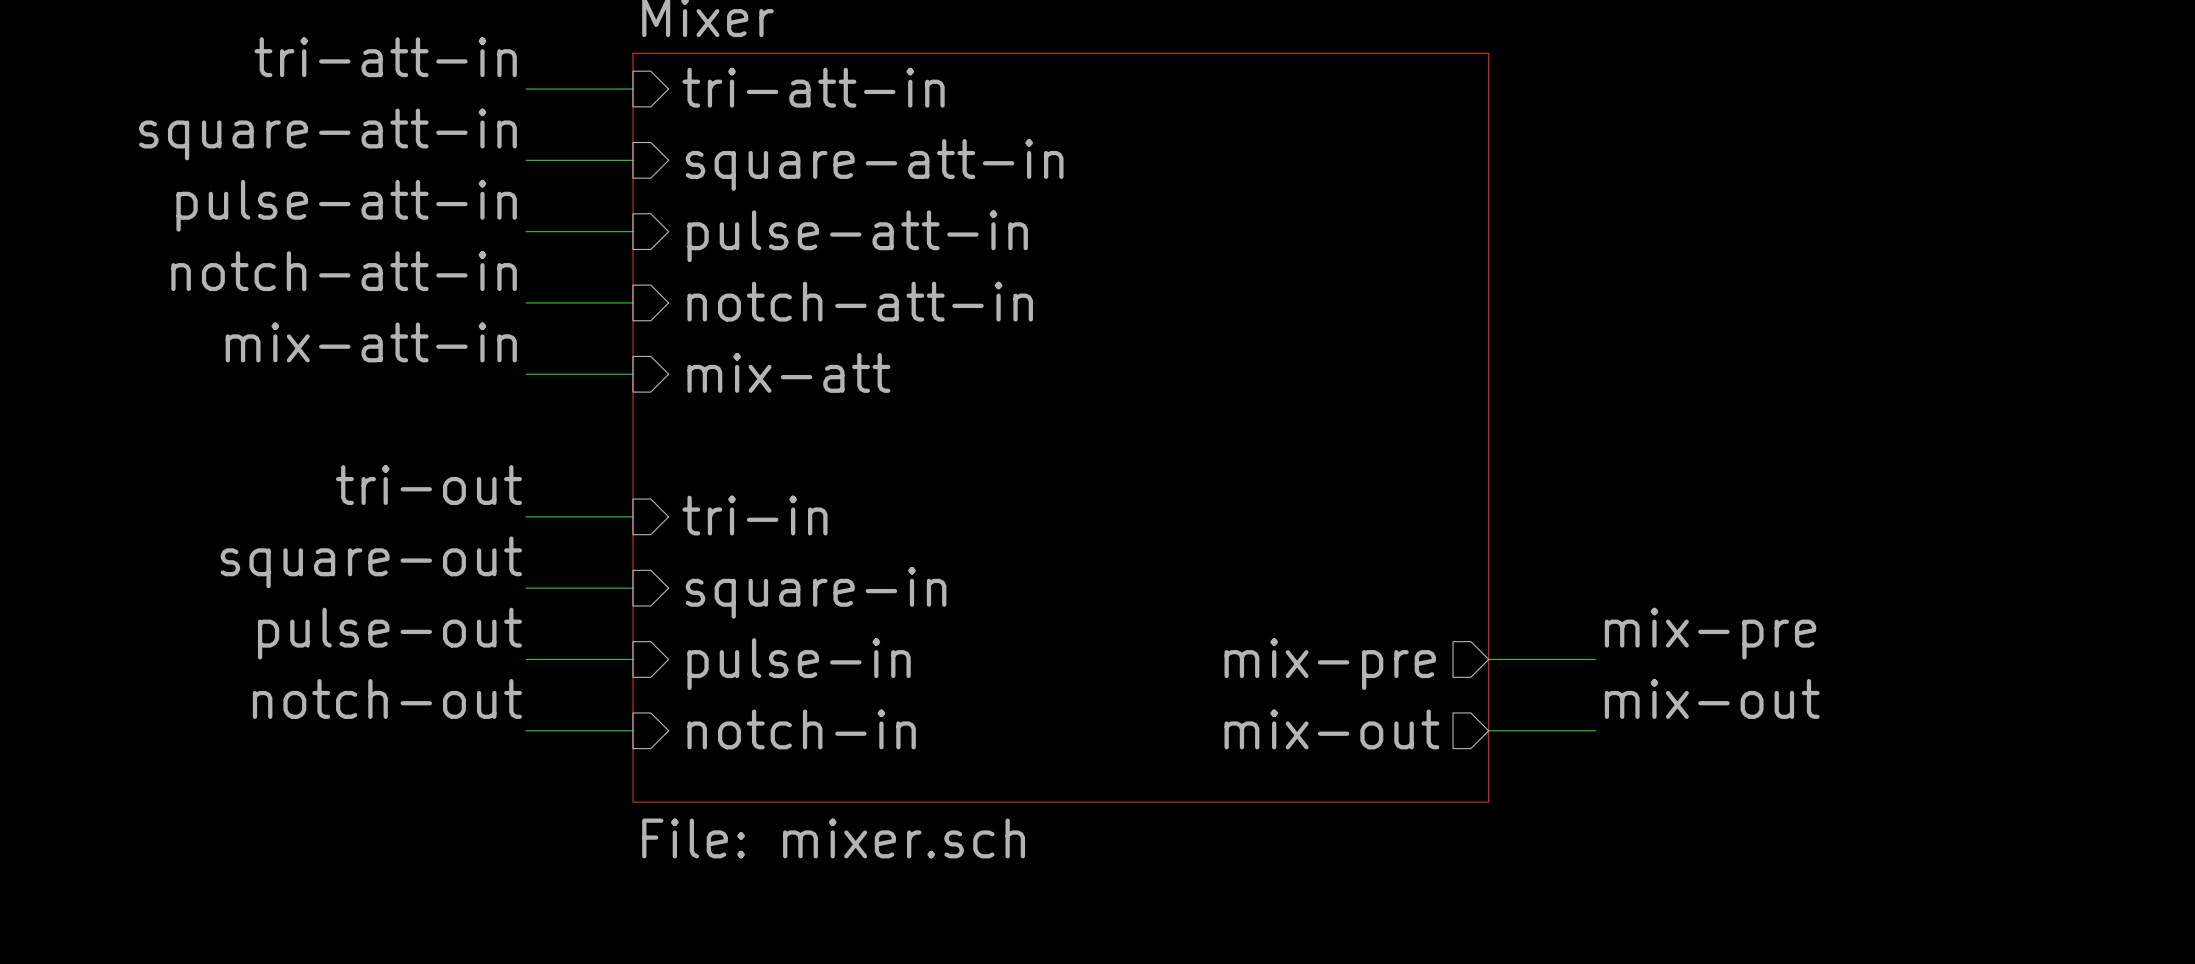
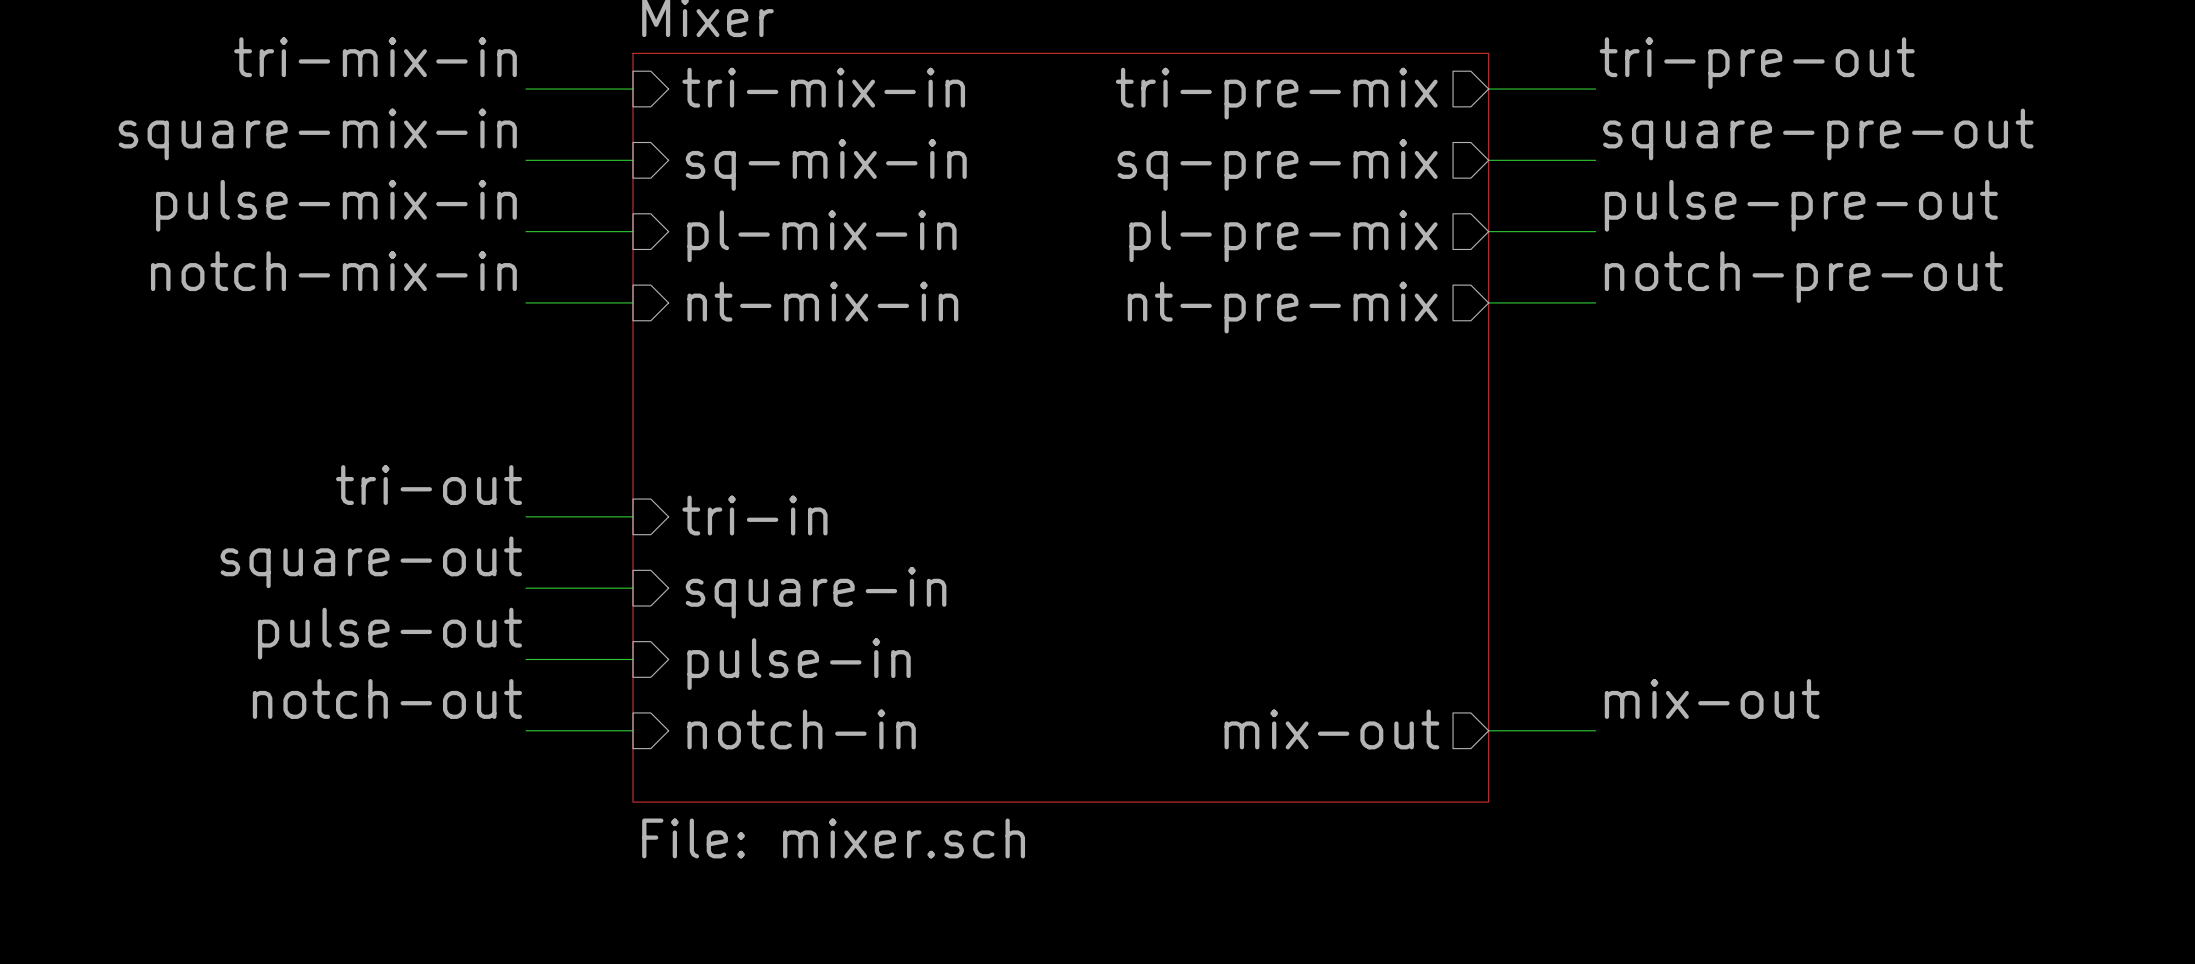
label: tri-att-in (385, 57) -> tri-mix-in (375, 57)
label: none -> tri-pre-out (1757, 63)
sheet pin: tri-att-in (813, 87) -> tri-mix-in (823, 87)
wire: none -> (1488, 89) (1595, 89)
sheet pin: none -> tri-pre-mix (1276, 93)
label: square-att-in (327, 134) -> square-mix-in (317, 134)
label: none -> square-pre-out (1818, 134)
wire: none -> (1488, 160) (1595, 160)
sheet pin: square-att-in (874, 164) -> sq-mix-in (826, 164)
sheet pin: none -> sq-pre-mix (1277, 164)
label: pulse-att-in (346, 205) -> pulse-mix-in (336, 205)
label: none -> pulse-pre-out (1801, 205)
wire: none -> (1488, 231) (1595, 231)
sheet pin: pulse-att-in (857, 236) -> pl-mix-in (822, 236)
sheet pin: none -> pl-pre-mix (1283, 236)
label: notch-att-in (344, 271) -> notch-mix-in (333, 271)
label: none -> notch-pre-out (1803, 277)
sheet pin: notch-att-in (860, 301) -> nt-mix-in (822, 301)
sheet pin: none -> nt-pre-mix (1282, 307)
label: mix-att-in (371, 342) -> none
sheet pin: mix-att (788, 372) -> none
wire: (526, 374) (632, 374) -> none
label: mix-pre (1710, 633) -> none
wire: (1488, 659) (1595, 659) -> (1488, 302) (1595, 302)
sheet pin: mix-pre (1330, 664) -> none

